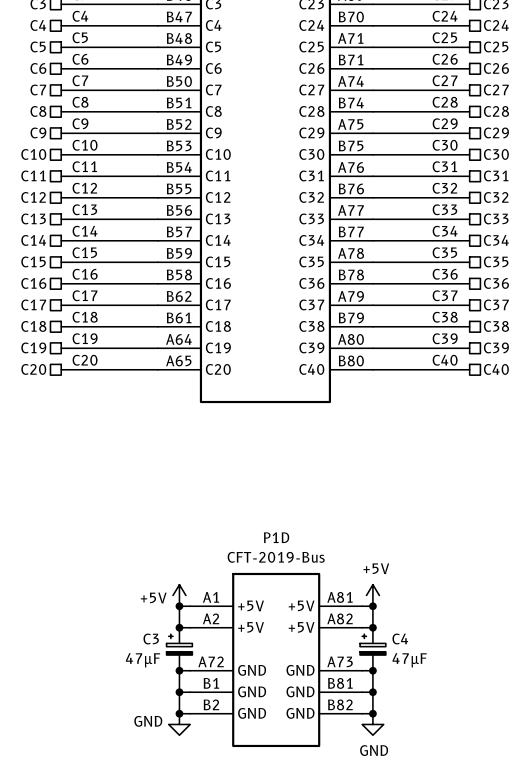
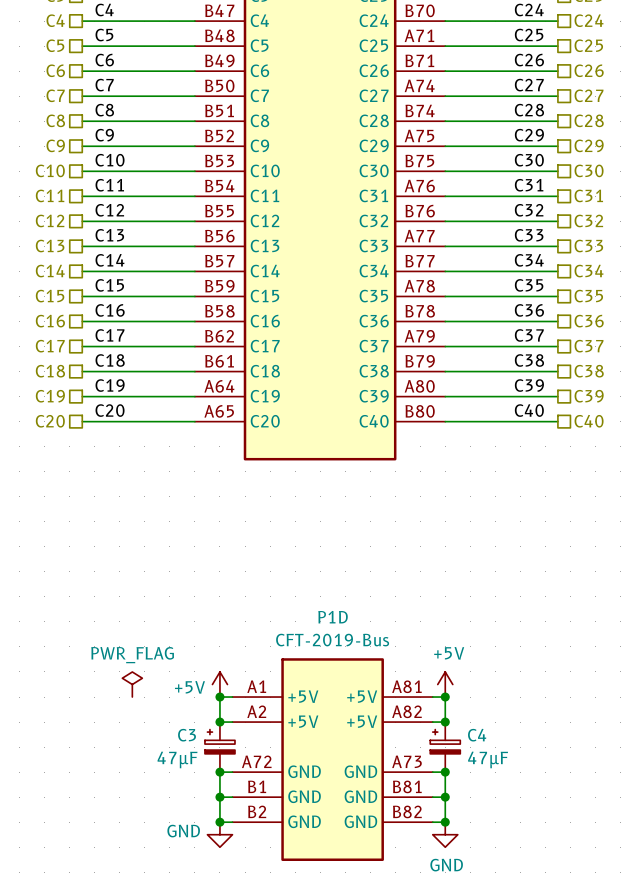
power symbol: none -> PWR_FLAG (132, 684)

